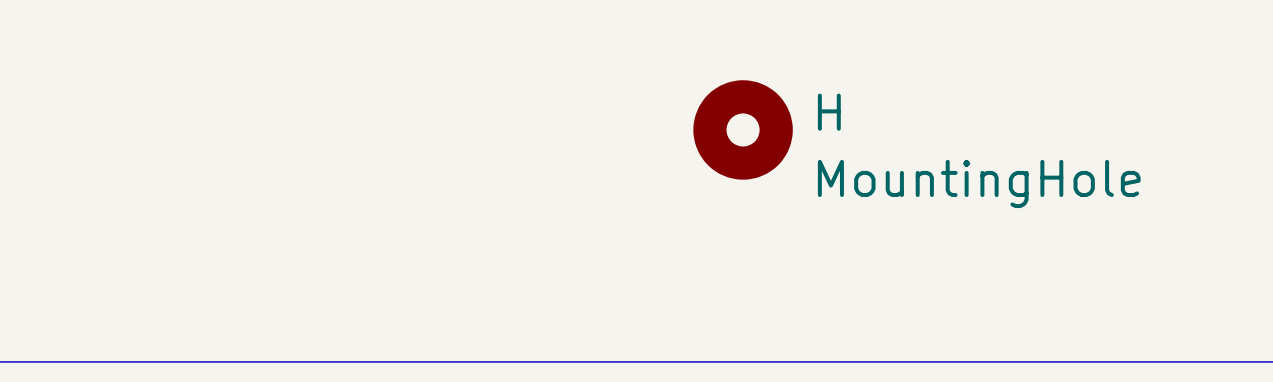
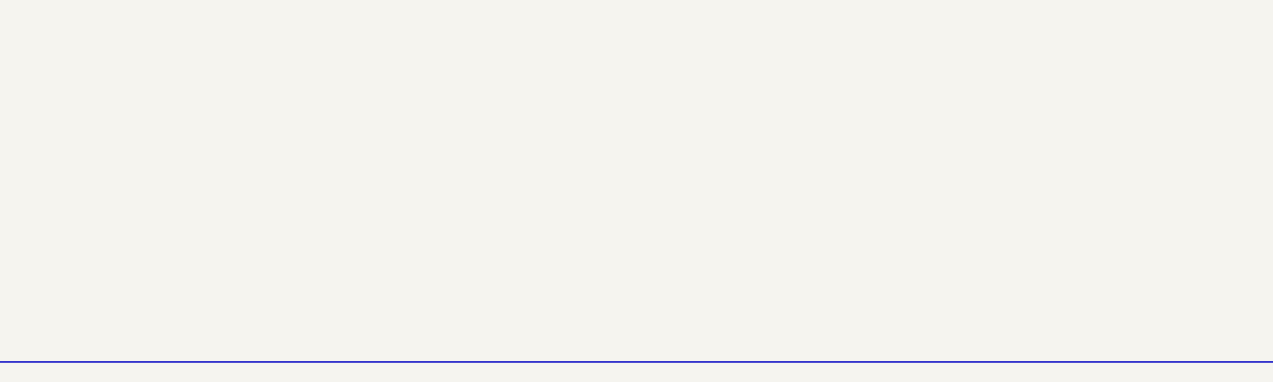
H: MountingHole (743, 129) -> none

